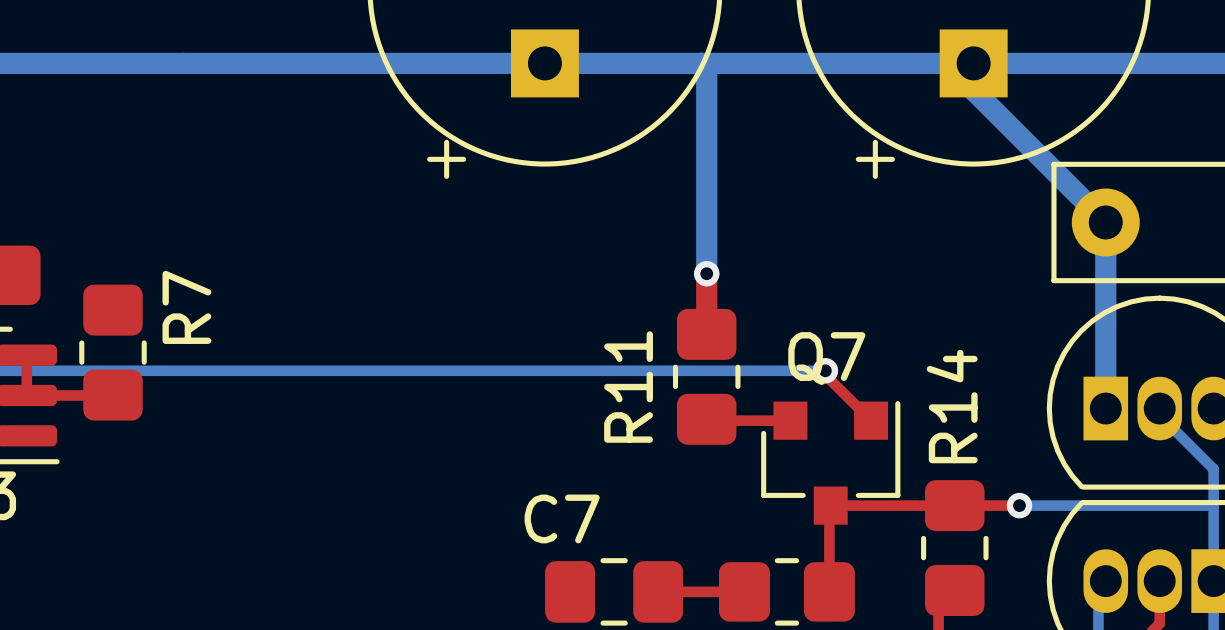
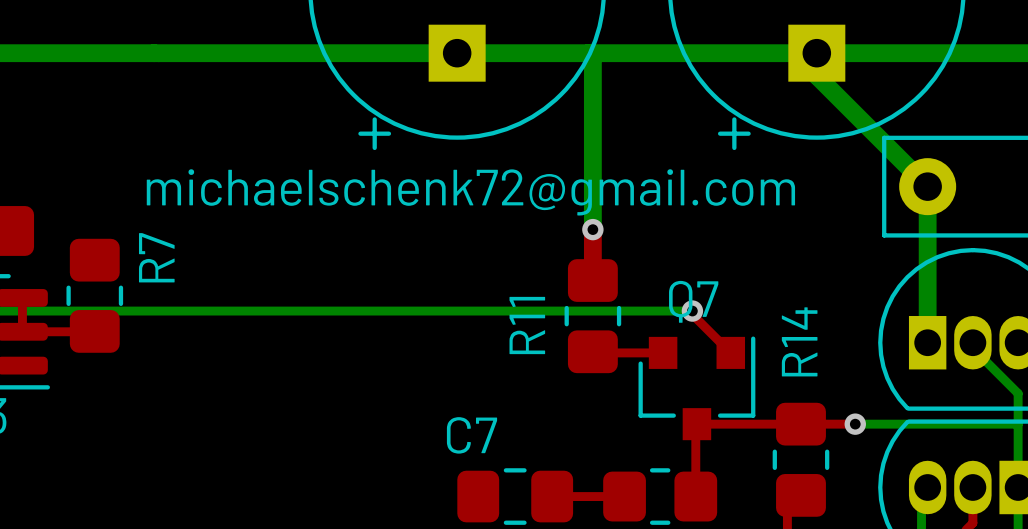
text: none -> michaelschenk72@gmail.com (470, 192)

